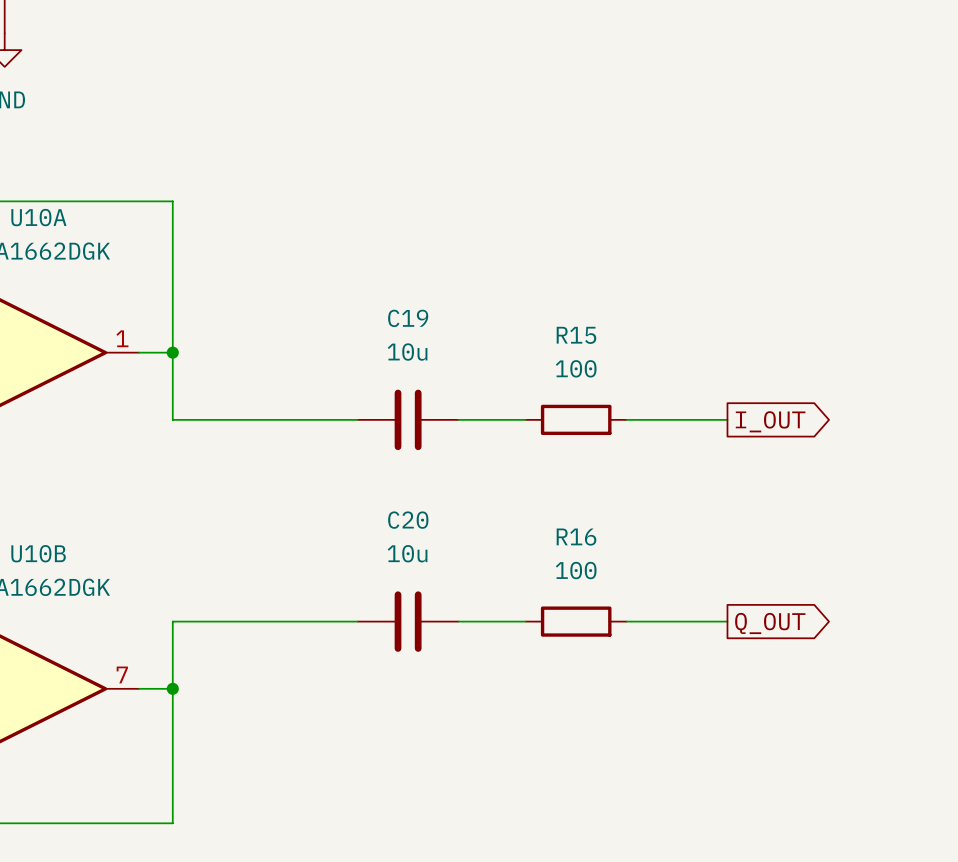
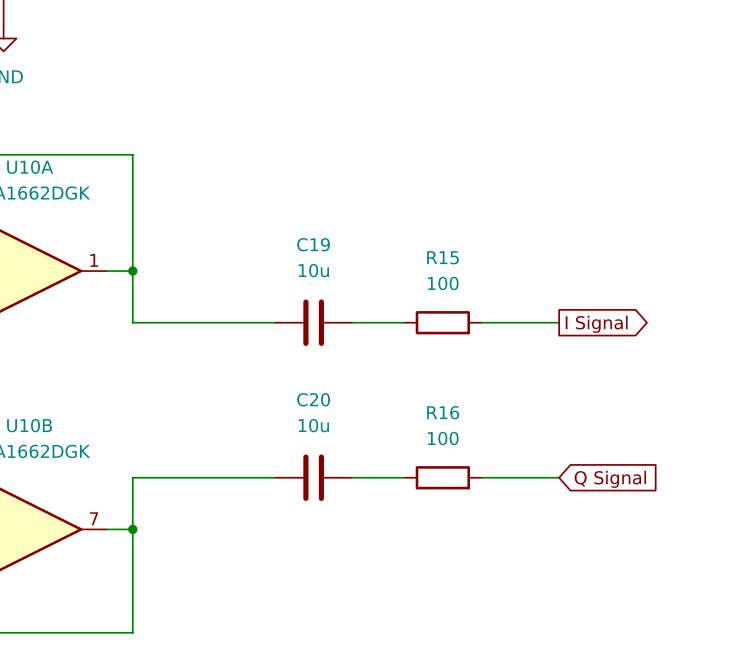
global label: I_OUT (770, 421) -> I Signal (596, 324)
global label shape: output (770, 623) -> input (610, 479)
global label: Q_OUT (770, 623) -> Q Signal (610, 479)

